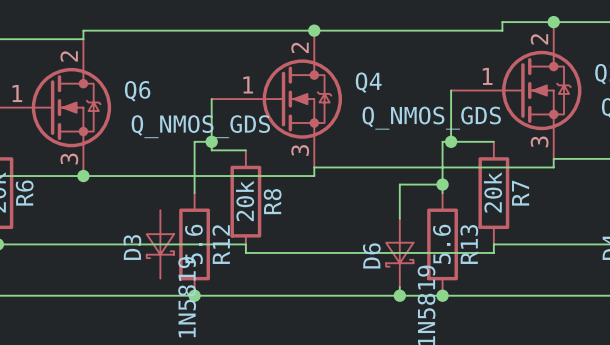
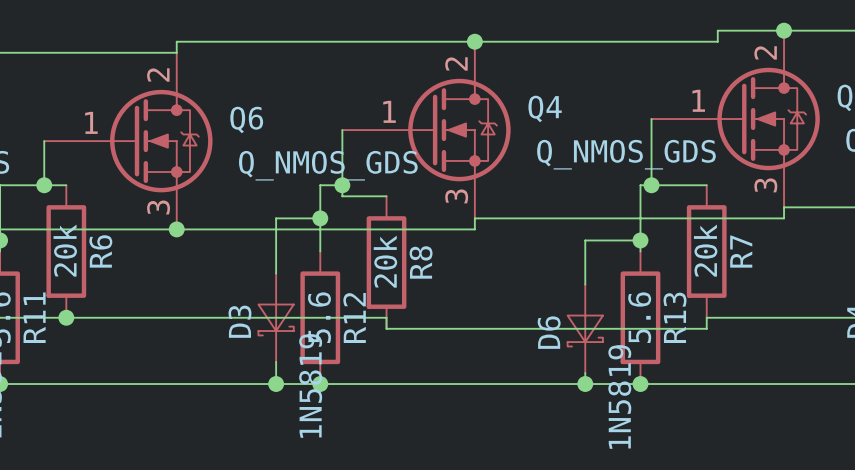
wire: none -> (320, 218) (276, 218) (276, 273)
junction: none -> (320, 218)
wire: none -> (276, 361) (276, 384)
junction: none -> (276, 384)

